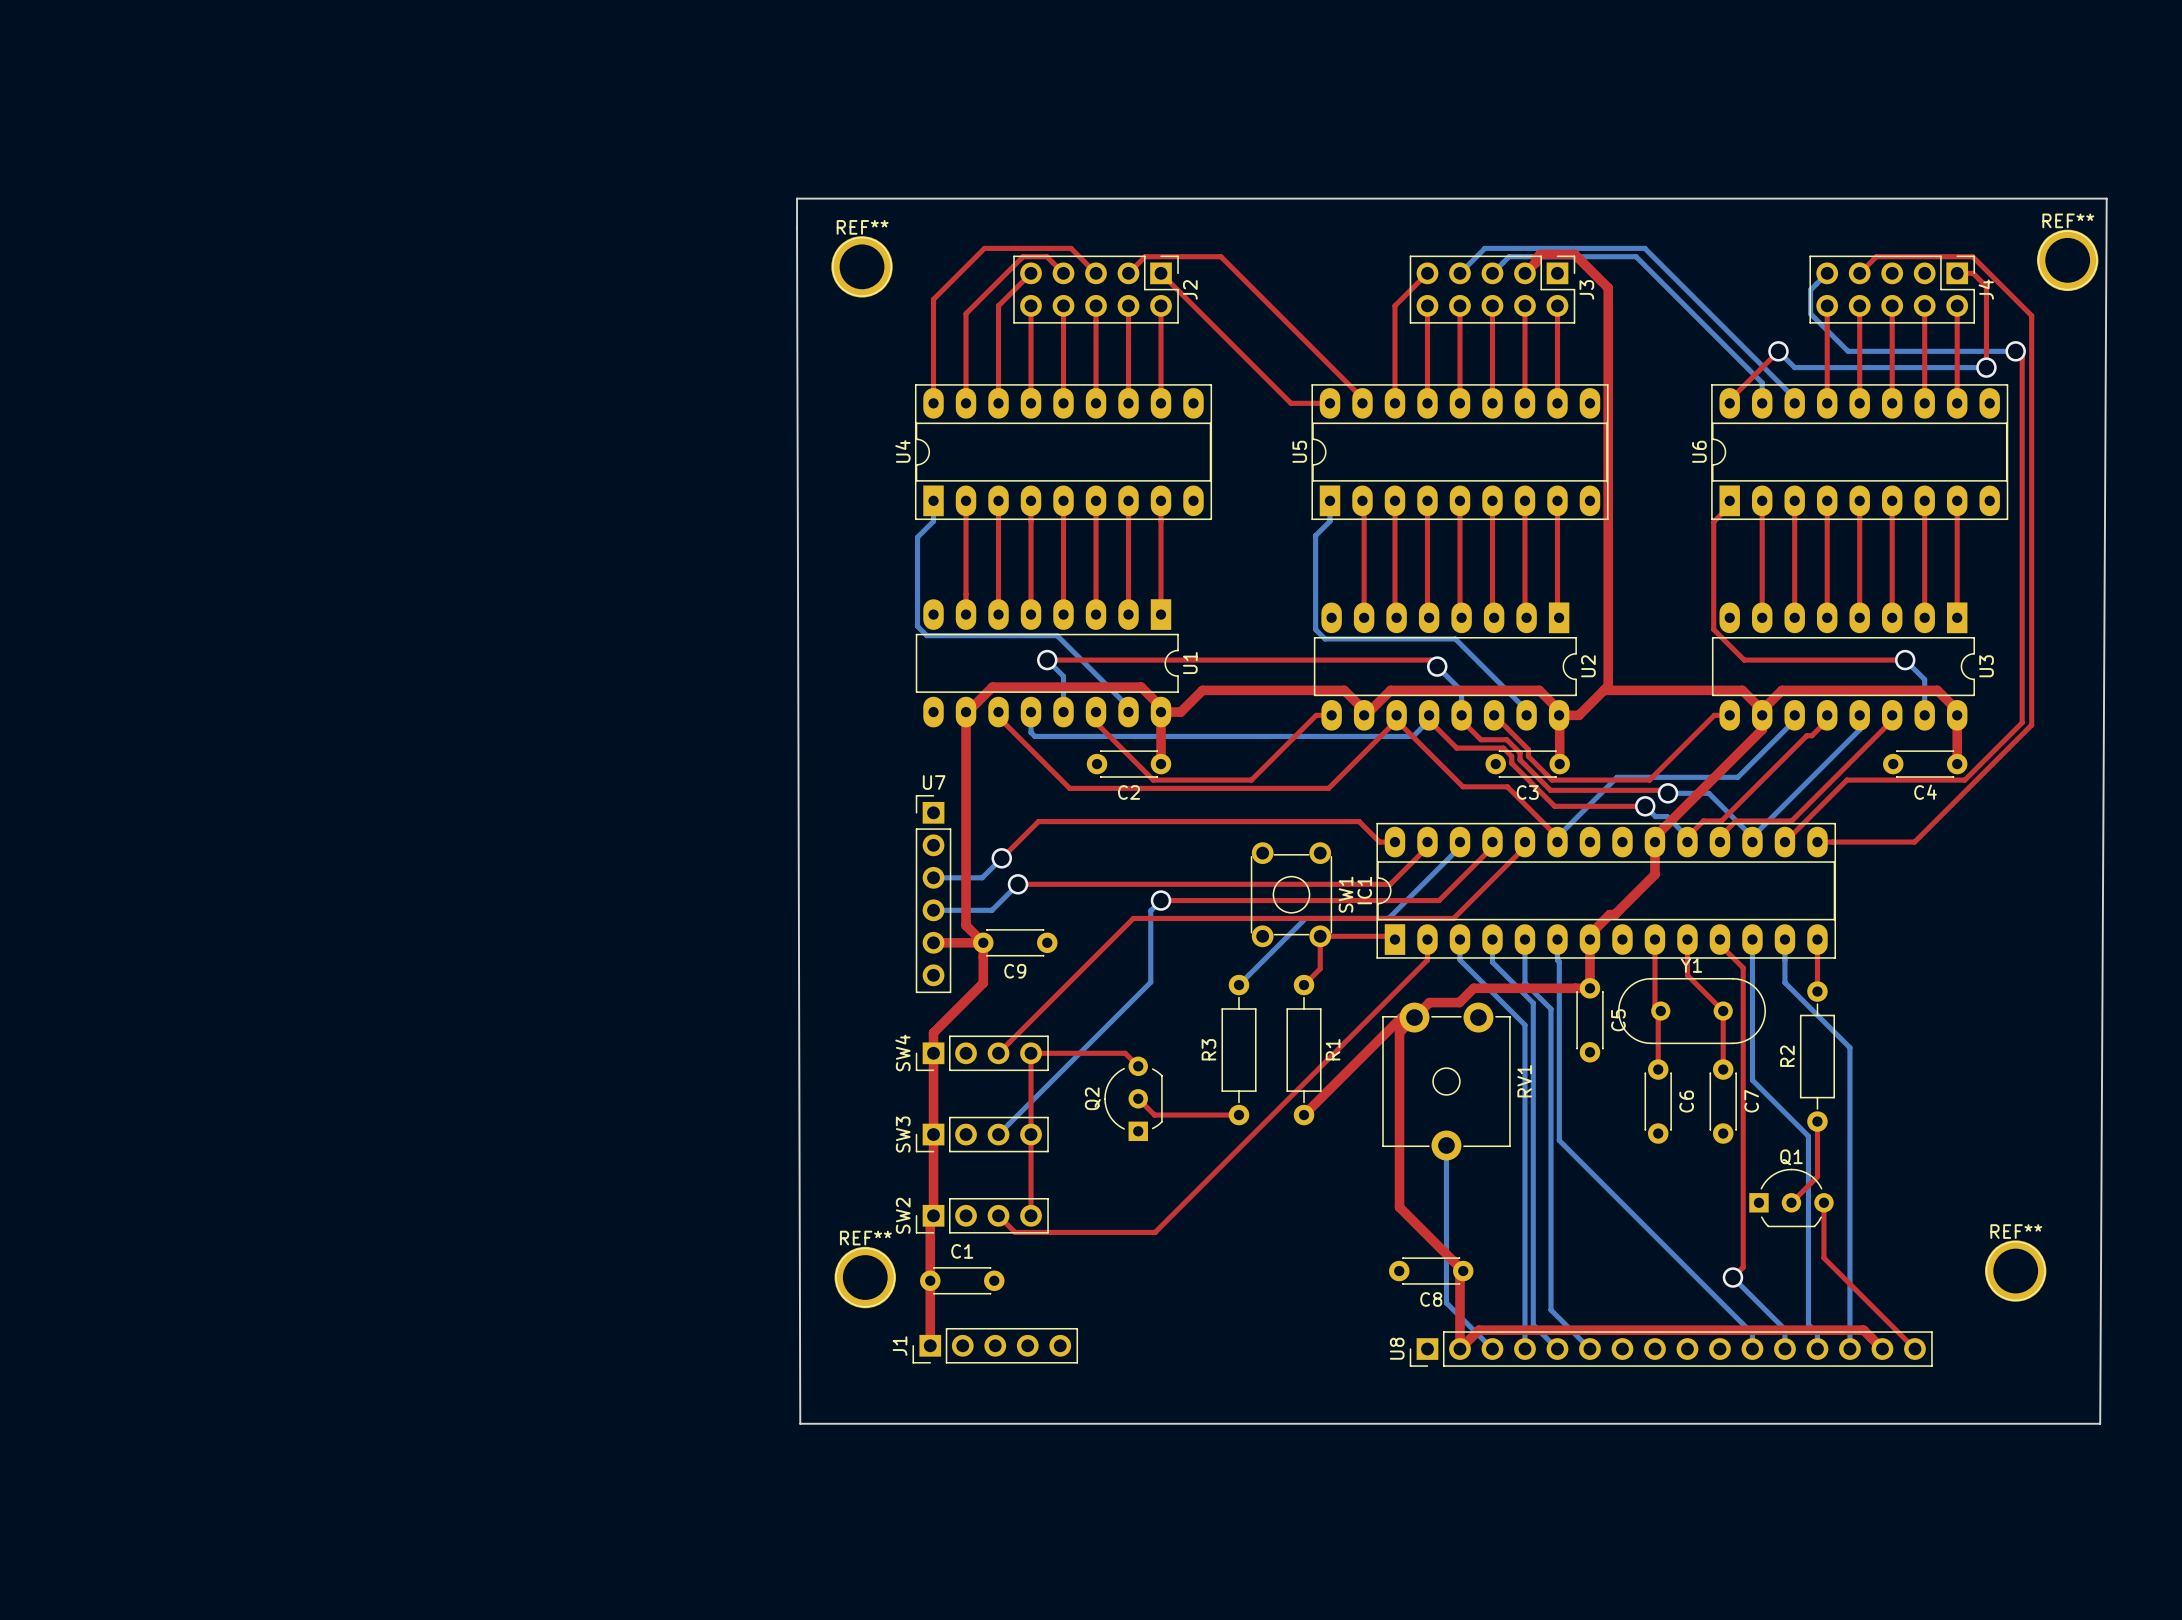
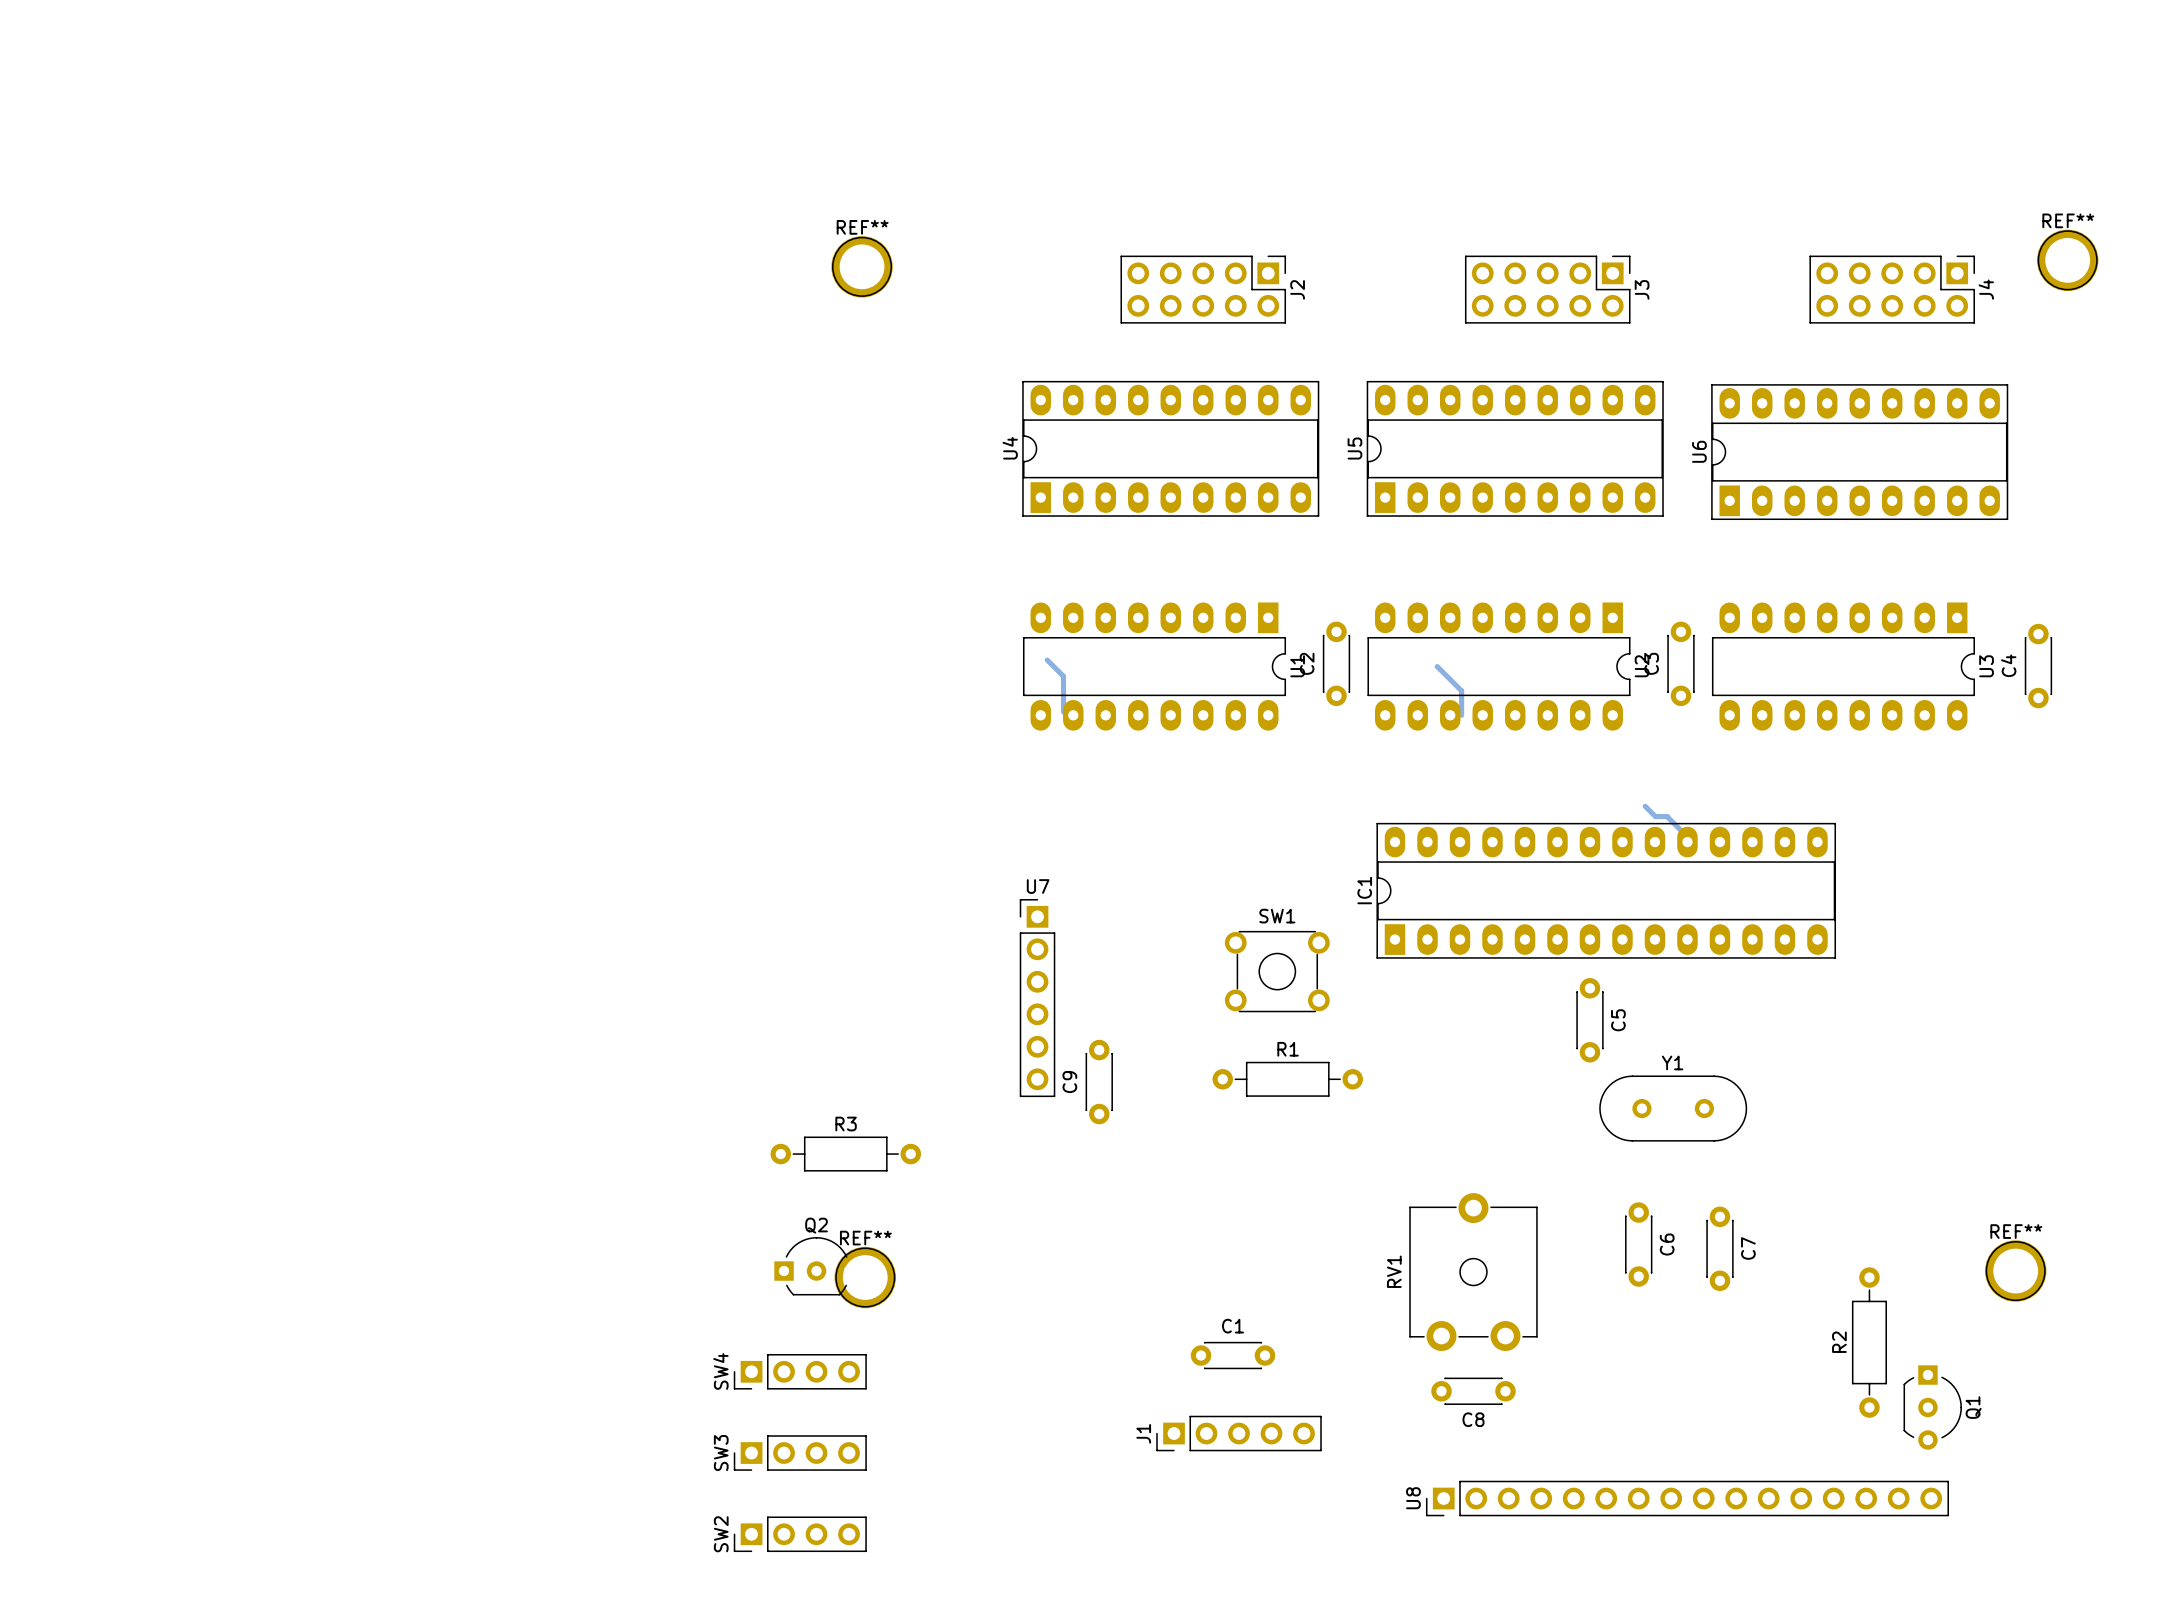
board edge: (797, 198) (800, 1423) (2100, 1423) (2106, 198) (797, 198) -> none
top track: (1031, 273) (998, 305) (998, 403) -> none
top track: (1063, 273) (1046, 256) (1023, 256) (966, 313) (966, 403) -> none
top track: (1096, 273) (1071, 248) (984, 248) (933, 299) (933, 403) -> none
top track: (1128, 273) (1145, 256) (1220, 256) (1362, 398) (1362, 403) -> none
top track: (1161, 273) (1291, 403) (1329, 403) -> none
top track: (1427, 273) (1394, 305) (1394, 403) -> none
bottom track: (1459, 273) (1484, 248) (1644, 248) (1794, 398) (1794, 403) -> none
bottom track: (1492, 273) (1509, 256) (1636, 256) (1762, 382) (1762, 403) -> none
top track: (1524, 273) (1535, 262) (1535, 258) (1540, 254) (1574, 254) (1608, 287) (1608, 686) (1578, 715) (1559, 715) -> none
bottom track: (1827, 273) (1810, 289) (1810, 313) (1848, 351) (2015, 351) -> none
top track: (1859, 273) (1876, 256) (1972, 256) (2031, 315) (2031, 725) (1914, 842) (1817, 842) -> none
top track: (1957, 273) (1973, 273) (1986, 286) (1986, 367) -> none
J2 position: (1096, 289) -> (1203, 289)
J3 position: (1492, 289) -> (1547, 289)
top track: (1031, 305) (1031, 403) -> none
top track: (1063, 305) (1063, 403) -> none
top track: (1096, 305) (1096, 403) -> none
top track: (1128, 305) (1128, 403) -> none
top track: (1161, 305) (1161, 403) -> none
top track: (1427, 305) (1427, 403) -> none
top track: (1459, 305) (1459, 403) -> none
top track: (1492, 305) (1492, 403) -> none
top track: (1524, 305) (1524, 403) -> none
top track: (1557, 305) (1557, 403) -> none
top track: (1827, 305) (1827, 403) -> none
top track: (1859, 305) (1859, 403) -> none
top track: (1892, 305) (1892, 403) -> none
top track: (1924, 305) (1924, 403) -> none
top track: (1957, 305) (1957, 403) -> none
top track: (1778, 351) (1729, 400) (1729, 403) -> none
bottom track: (1778, 351) (1794, 367) (1986, 367) -> none
via: (1778, 351) -> none
top track: (2015, 351) (2022, 357) (2022, 722) (1964, 780) (1846, 780) (1784, 842) -> none
via: (2015, 351) -> none
via: (1986, 367) -> none
U4 position: (1063, 452) -> (1170, 448)
U5 position: (1459, 452) -> (1515, 448)
bottom track: (933, 500) (933, 521) (917, 537) (917, 626) (926, 635) (1057, 635) (1128, 706) (1128, 712) -> none
top track: (966, 500) (966, 614) -> none
top track: (998, 500) (998, 614) -> none
top track: (1031, 500) (1031, 614) -> none
top track: (1063, 500) (1063, 614) -> none
top track: (1096, 500) (1096, 614) -> none
top track: (1128, 500) (1128, 614) -> none
top track: (1161, 500) (1161, 614) -> none
bottom track: (1329, 500) (1329, 521) (1315, 535) (1315, 629) (1324, 638) (1455, 638) (1526, 710) (1526, 715) -> none
top track: (1362, 500) (1364, 502) (1364, 617) -> none
top track: (1394, 500) (1394, 616) (1396, 617) -> none
top track: (1427, 500) (1427, 616) (1429, 617) -> none
top track: (1459, 500) (1459, 611) (1461, 617) -> none
top track: (1492, 500) (1492, 616) (1494, 617) -> none
top track: (1524, 500) (1524, 616) (1526, 617) -> none
top track: (1557, 500) (1557, 616) (1559, 617) -> none
top track: (1729, 500) (1729, 505) (1713, 521) (1713, 629) (1744, 660) (1905, 660) -> none
top track: (1762, 500) (1762, 617) -> none
top track: (1794, 500) (1794, 617) -> none
top track: (1827, 500) (1827, 617) -> none
top track: (1859, 500) (1859, 617) -> none
top track: (1892, 500) (1892, 617) -> none
top track: (1924, 500) (1924, 617) -> none
top track: (1957, 500) (1957, 617) -> none
top track: (1047, 660) (1430, 660) (1437, 666) -> none
via: (1047, 660) -> none
bottom track: (1905, 660) (1924, 679) (1924, 715) -> none
via: (1905, 660) -> none
U1 position: (1047, 663) -> (1154, 666)
via: (1437, 666) -> none
U2 position: (1445, 666) -> (1498, 666)
top track: (1603, 690) (1742, 690) (1762, 710) -> none
top track: (1762, 710) (1782, 690) (1937, 690) (1957, 710) (1957, 764) -> none
top track: (1762, 710) (1762, 729) (1654, 836) (1654, 874) (1614, 914) (1609, 914) (1589, 934) (1589, 988) (1473, 988) (1459, 1002) (1429, 1002) (1399, 1032) (1399, 1207) (1463, 1271) (1459, 1274) (1459, 1349) (1478, 1330) (1863, 1330) (1882, 1349) -> none
top track: (998, 712) (998, 717) (1069, 788) (1328, 788) (1396, 720) -> none
bottom track: (1031, 712) (1031, 732) (1034, 736) (1413, 736) (1429, 720) (1429, 715) -> none
top track: (1096, 712) (1096, 722) (1153, 780) (1251, 780) (1316, 715) (1331, 715) -> none
top track: (1161, 712) (1180, 712) (1202, 690) (1344, 690) (1364, 710) (1364, 715) (1390, 690) (1539, 690) (1559, 710) (1559, 715) -> none
top track: (1429, 715) (1429, 720) (1456, 748) (1503, 748) (1511, 756) (1511, 763) (1554, 806) (1645, 806) -> none
top track: (1461, 715) (1461, 720) (1480, 739) (1506, 739) (1520, 752) (1520, 759) (1550, 790) (1664, 790) (1667, 793) -> none
top track: (1494, 715) (1528, 749) (1528, 756) (1552, 780) (1649, 780) (1714, 715) (1729, 715) -> none
top track: (1559, 715) (1559, 764) -> none
bottom track: (1794, 715) (1794, 720) (1737, 777) (1617, 777) (1557, 836) (1557, 842) -> none
top track: (1827, 715) (1827, 720) (1811, 735) (1806, 735) (1721, 820) (1703, 820) (1687, 836) (1687, 842) -> none
bottom track: (1859, 715) (1859, 729) (1752, 836) -> none
top track: (1892, 715) (1892, 720) (1791, 820) (1735, 820) (1719, 836) (1719, 842) -> none
top track: (1396, 720) (1462, 786) (1507, 786) (1557, 836) (1557, 842) -> none
C2 rotation: 0° (1129, 764) -> 90° clockwise (1336, 663)
C2 position: (1129, 764) -> (1336, 663)
top track: (1161, 764) (1161, 706) (1141, 687) (992, 687) (966, 712) (966, 925) (983, 942) -> none
C3 rotation: 0° (1527, 764) -> 90° clockwise (1680, 663)
C3 position: (1527, 764) -> (1680, 663)
C4 rotation: 0° (1925, 764) -> 90° clockwise (2038, 666)
C4 position: (1925, 764) -> (2038, 666)
bottom track: (1667, 793) (1708, 793) (1752, 836) -> none
via: (1667, 793) -> none
via: (1645, 806) -> none
top track: (1394, 842) (1379, 842) (1359, 821) (1038, 821) (1001, 858) -> none
top track: (1427, 842) (1427, 847) (1390, 884) (1018, 884) -> none
bottom track: (1459, 842) (1459, 847) (1388, 918) (1305, 918) (1239, 985) -> none
top track: (1492, 842) (1492, 847) (1439, 900) (1161, 900) -> none
top track: (1524, 842) (1524, 847) (1453, 918) (1133, 918) (998, 1053) -> none
bottom track: (1001, 858) (982, 877) (933, 877) -> none
via: (1001, 858) -> none
bottom track: (1018, 884) (992, 910) (933, 910) -> none
via: (1018, 884) -> none
U7 position: (933, 894) -> (1037, 998)
SW1 rotation: 0° (1291, 894) -> 90° clockwise (1277, 971)
SW1 position: (1291, 894) -> (1277, 971)
SW1 name position: SW1 (1345, 894) -> SW1 (1277, 916)
bottom track: (1161, 900) (1150, 910) (1150, 982) (998, 1134) -> none
via: (1161, 900) -> none
top track: (1394, 939) (1391, 936) (1320, 936) (1320, 968) (1304, 985) -> none
top track: (1427, 939) (1427, 960) (1155, 1232) (1015, 1232) (998, 1215) -> none
bottom track: (1459, 939) (1459, 960) (1524, 1025) (1524, 1349) -> none
bottom track: (1492, 939) (1492, 962) (1533, 1003) (1533, 1324) (1557, 1349) -> none
bottom track: (1524, 939) (1524, 983) (1550, 1009) (1550, 1310) (1589, 1349) -> none
bottom track: (1557, 939) (1557, 960) (1559, 961) (1559, 1140) (1752, 1333) (1752, 1349) -> none
top track: (1654, 939) (1654, 1005) (1660, 1011) (1658, 1013) (1658, 1069) -> none
top track: (1687, 939) (1687, 975) (1723, 1011) (1723, 1069) -> none
top track: (1719, 939) (1719, 944) (1743, 967) (1743, 1267) (1732, 1277) -> none
bottom track: (1752, 939) (1752, 1080) (1808, 1136) (1808, 1324) (1817, 1333) (1817, 1349) -> none
bottom track: (1784, 939) (1784, 982) (1849, 1047) (1849, 1349) -> none
top track: (1817, 939) (1817, 991) -> none
top track: (933, 942) (983, 942) -> none
top track: (983, 942) (983, 983) (933, 1032) (933, 1215) (930, 1219) (930, 1345) -> none
C9 rotation: 0° (1015, 942) -> 90° clockwise (1099, 1082)
C9 position: (1015, 942) -> (1099, 1082)
Y1 position: (1692, 1011) -> (1673, 1108)
top track: (1414, 1017) (1401, 1017) (1304, 1115) -> none
R1 name position: R1 (1333, 1049) -> R1 (1288, 1049)
R3 rotation: 0° (1239, 1050) -> 90° clockwise (845, 1154)
R3 position: (1239, 1050) -> (845, 1154)
R1 rotation: 0° (1304, 1050) -> 90° clockwise (1287, 1079)
SW4 position: (982, 1053) -> (800, 1371)
R2 position: (1817, 1056) -> (1869, 1342)
top track: (1138, 1066) (1125, 1053) (1031, 1053) (1031, 1215) -> none
RV1 rotation: 0° (1446, 1081) -> 180° (1473, 1272)
RV1 position: (1446, 1081) -> (1473, 1272)
Q2 rotation: 0° (1133, 1098) -> 90° clockwise (816, 1266)
Q2 position: (1133, 1098) -> (816, 1266)
top track: (1138, 1098) (1154, 1115) (1239, 1115) -> none
C6 position: (1658, 1101) -> (1638, 1244)
C7 position: (1723, 1101) -> (1719, 1248)
top track: (1817, 1121) (1817, 1176) (1791, 1202) -> none
SW3 position: (982, 1134) -> (800, 1453)
bottom track: (1446, 1145) (1446, 1303) (1492, 1349) -> none
Q1 rotation: 0° (1791, 1197) -> 90° clockwise (1932, 1407)
Q1 position: (1791, 1197) -> (1932, 1407)
top track: (1823, 1202) (1823, 1258) (1914, 1349) -> none
SW2 position: (982, 1215) -> (800, 1534)
C8 position: (1431, 1271) -> (1473, 1391)
bottom track: (1732, 1277) (1784, 1329) (1784, 1349) -> none
via: (1732, 1277) -> none
C1 position: (962, 1280) -> (1233, 1355)
J1 position: (995, 1345) -> (1239, 1433)
U8 position: (1671, 1349) -> (1687, 1498)

